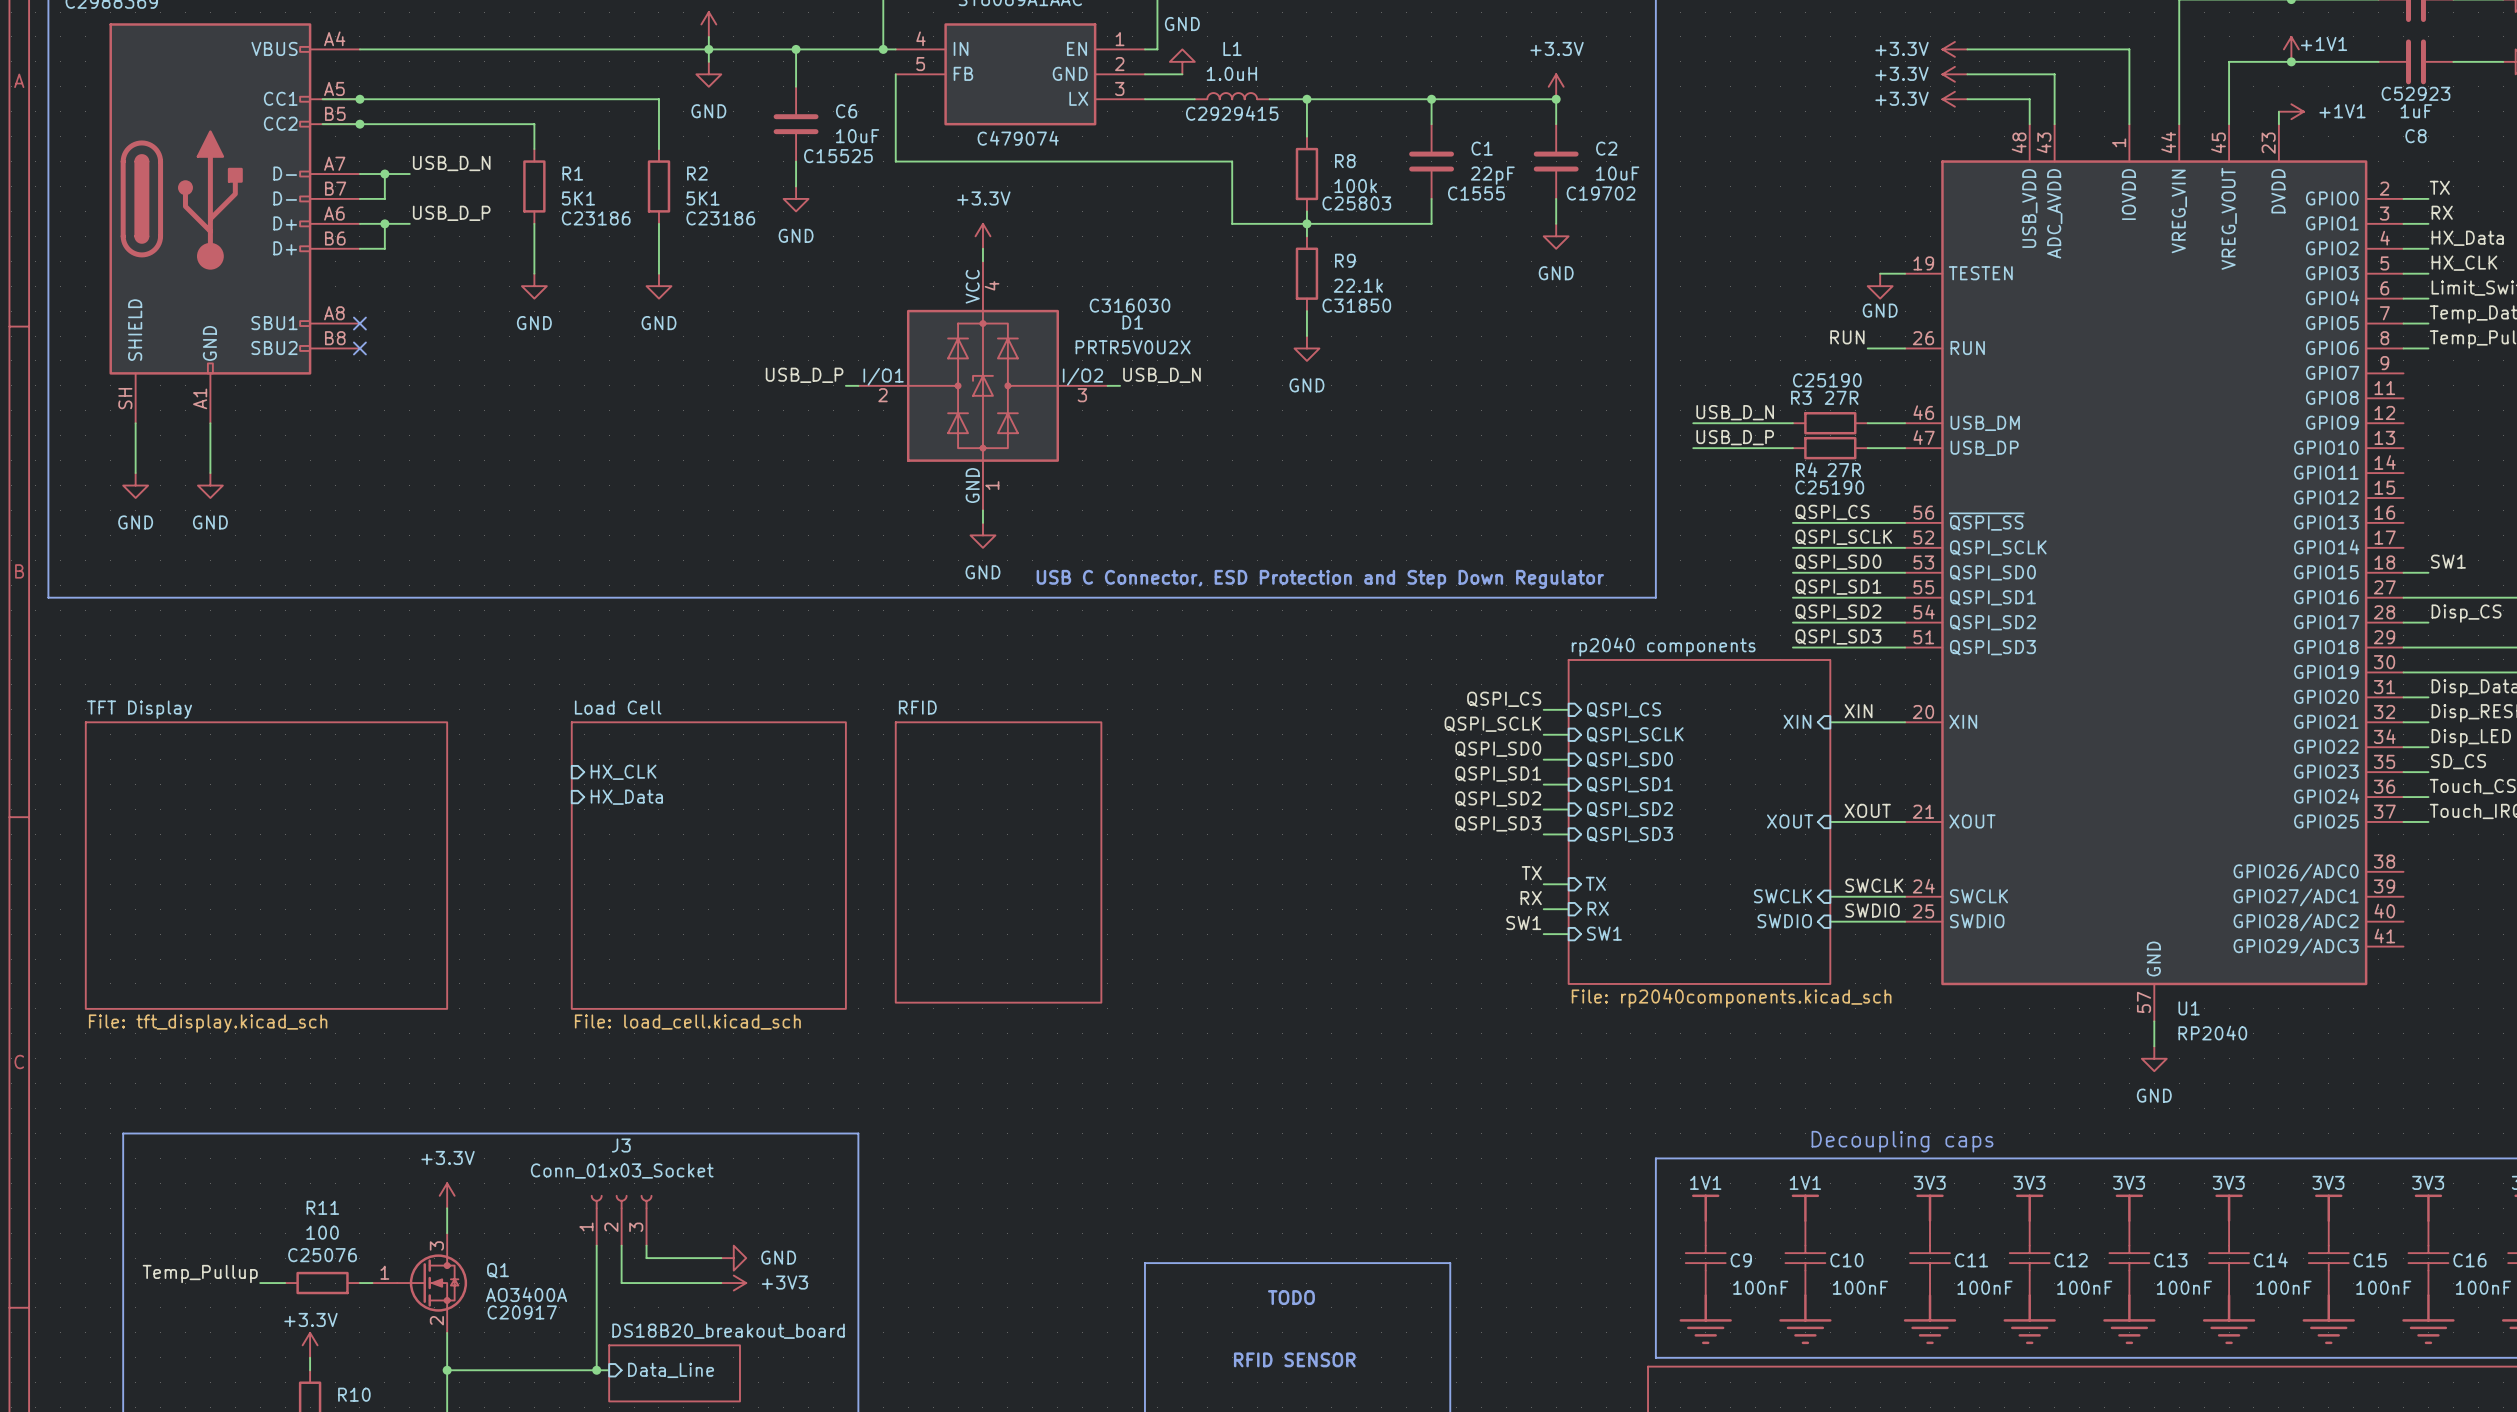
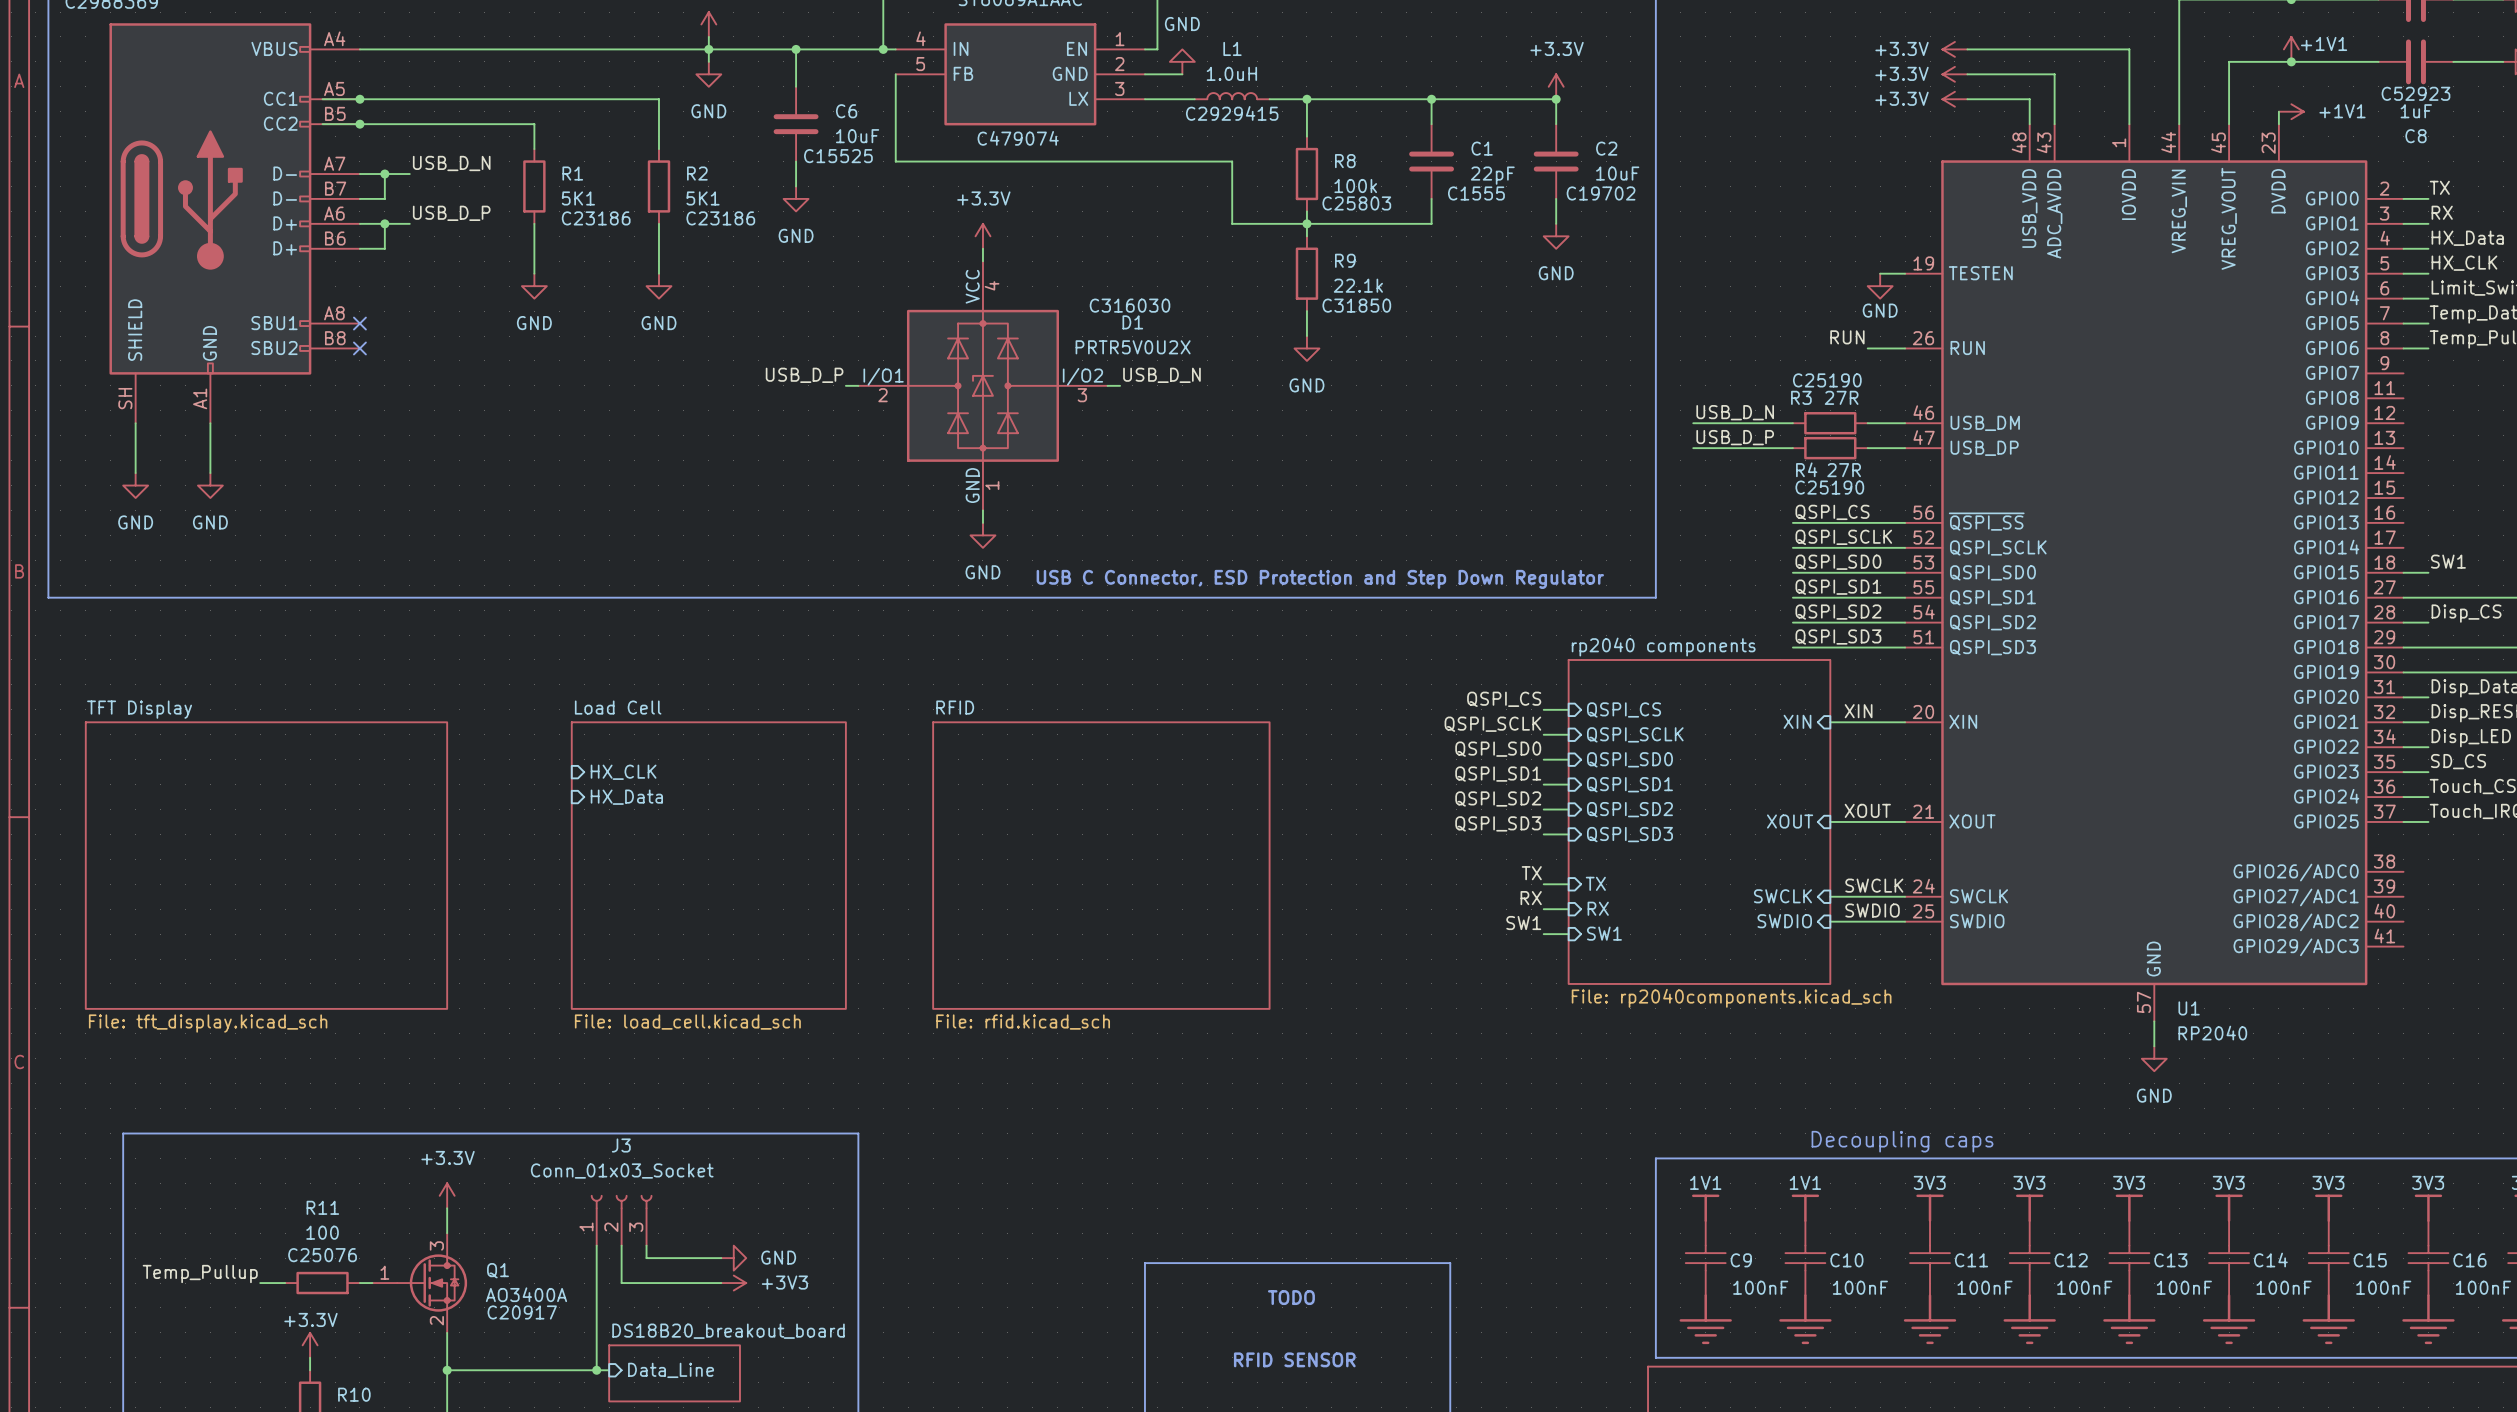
sheet RFID: (998, 862) -> none
sheet RFID: none -> File: rfid.kicad_sch (1101, 865)

